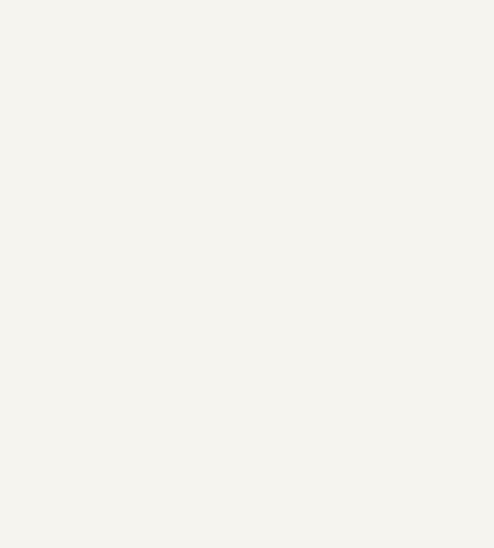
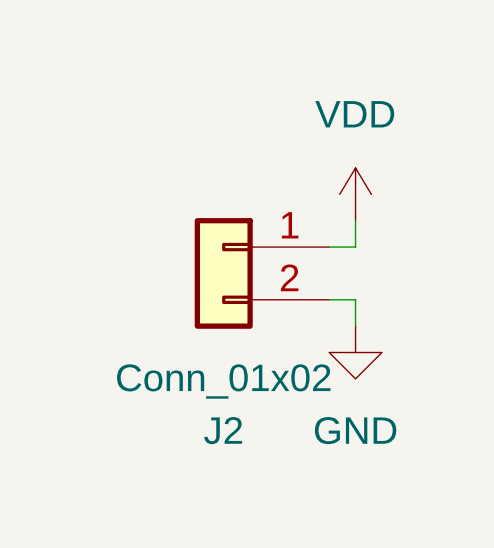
power symbol: none -> VDD (355, 194)
wire: none -> (355, 220) (355, 247) (329, 247)
J2: none -> Conn_01x02 (261, 273)
wire: none -> (329, 299) (355, 299) (355, 326)
power symbol: none -> GND (355, 352)

